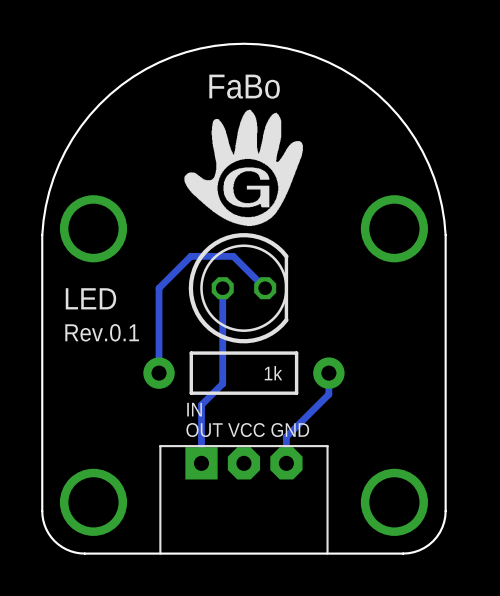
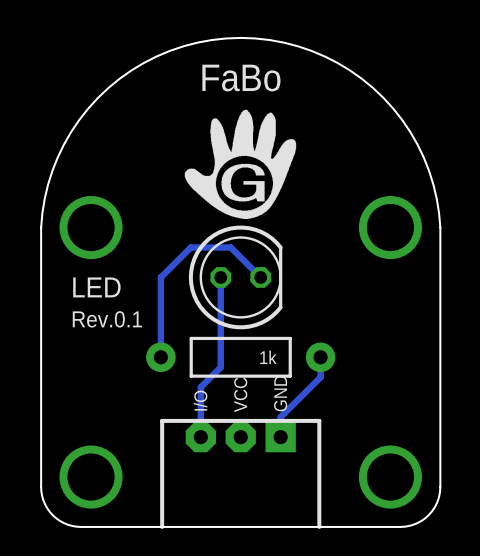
part footprint: [41, 42, 447, 555] -> [40, 36, 442, 529]
text: IN (194, 409) -> none
text: OUT (204, 430) -> none
text: VCC (246, 430) -> none
text: GND (290, 430) -> none

